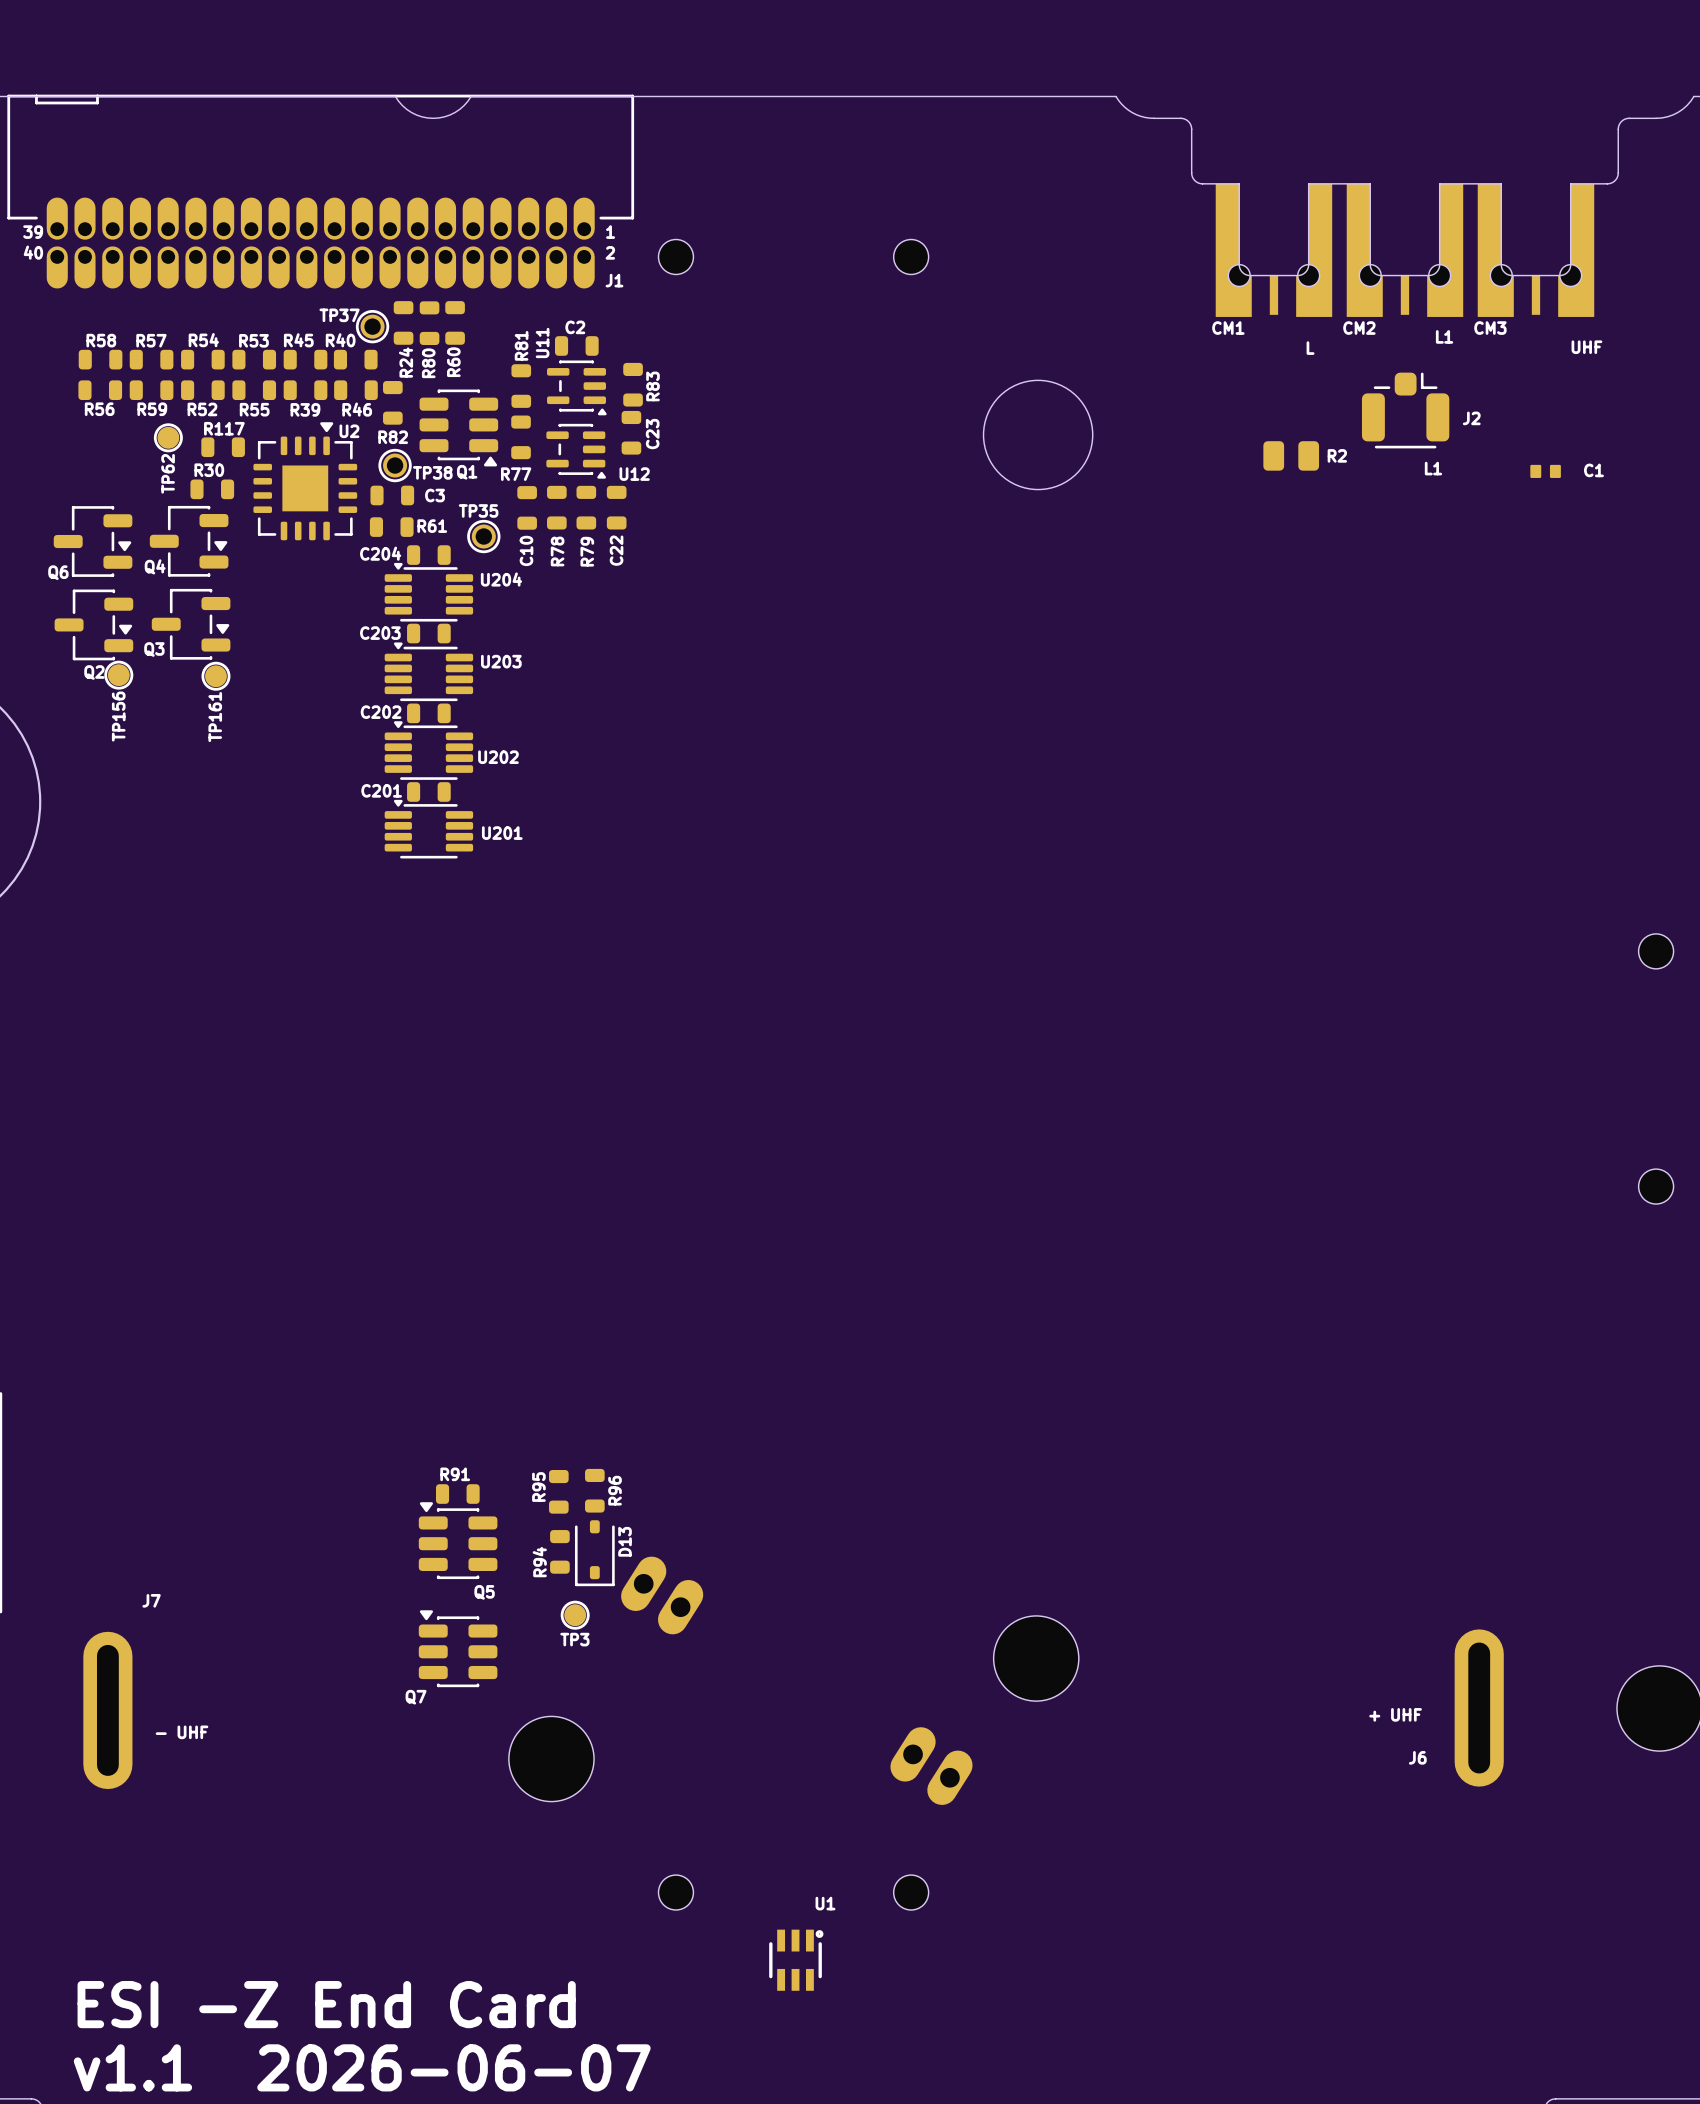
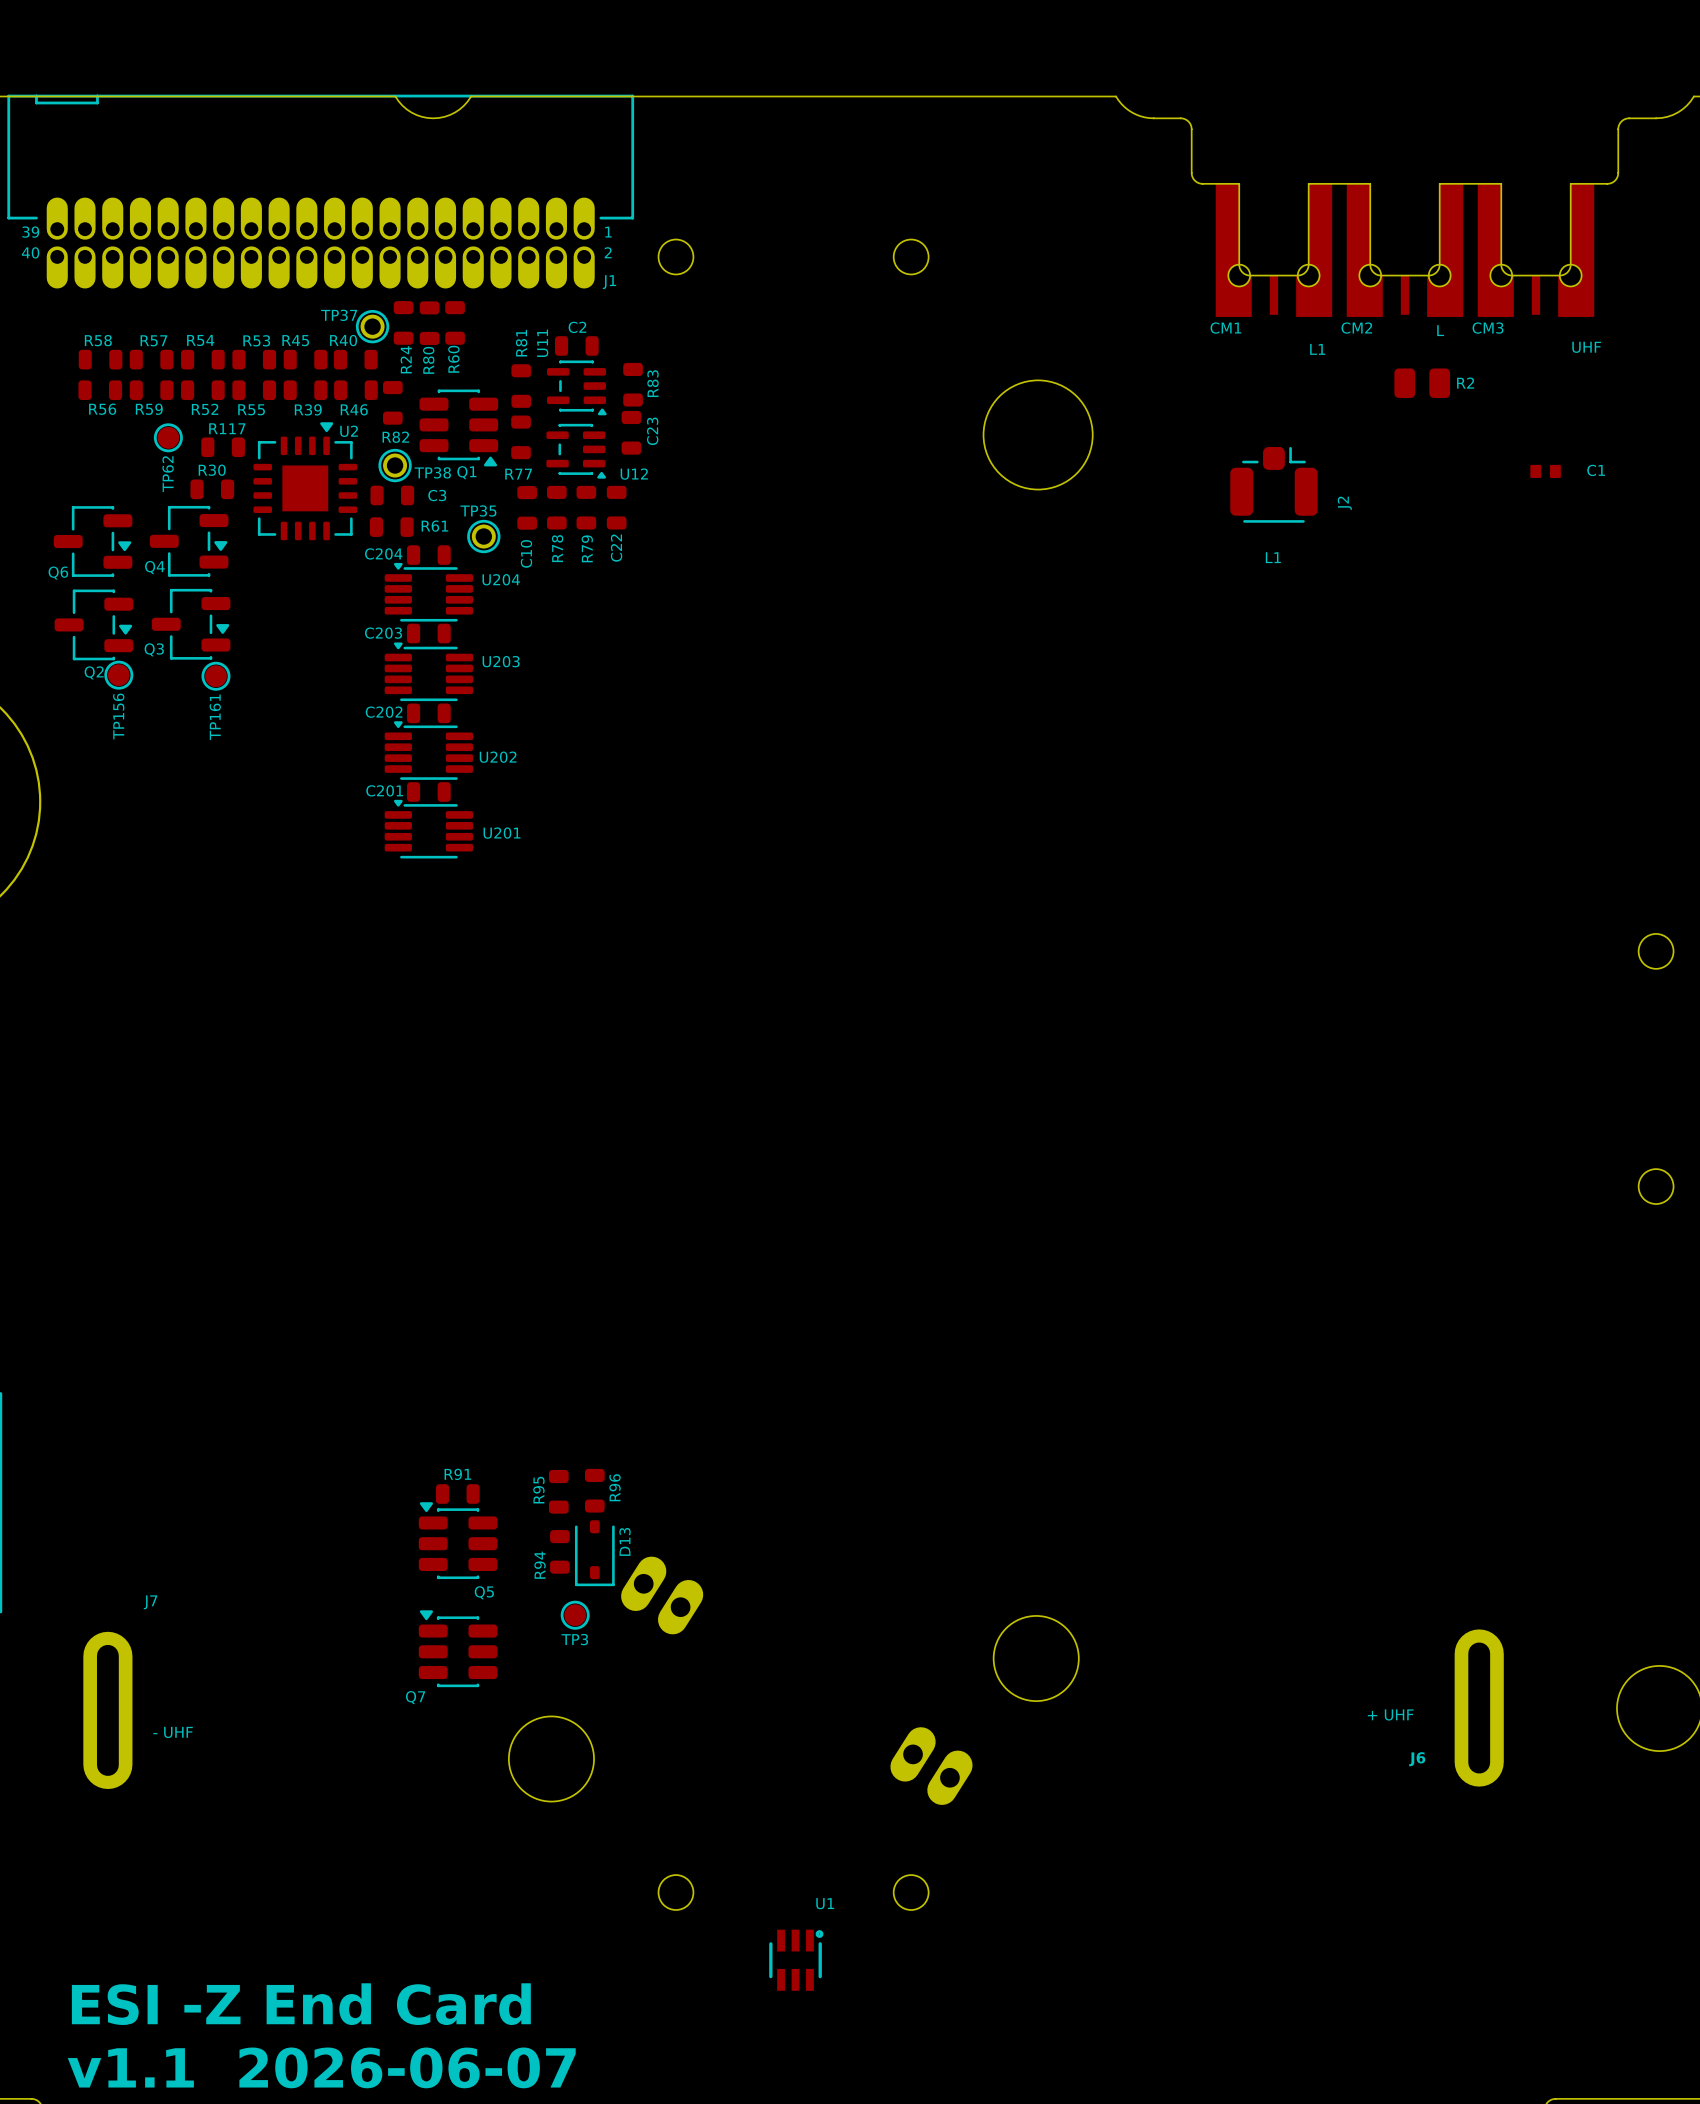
text: L1 (1444, 336) -> L (1440, 330)
text: L (1310, 348) -> L1 (1317, 349)
J2 position: (1405, 410) -> (1273, 484)
J2 name rotation: 0° (1471, 418) -> 90° counterclockwise (1344, 503)
R2 position: (1291, 455) -> (1422, 383)
text position: L1 (1433, 468) -> L1 (1273, 557)

